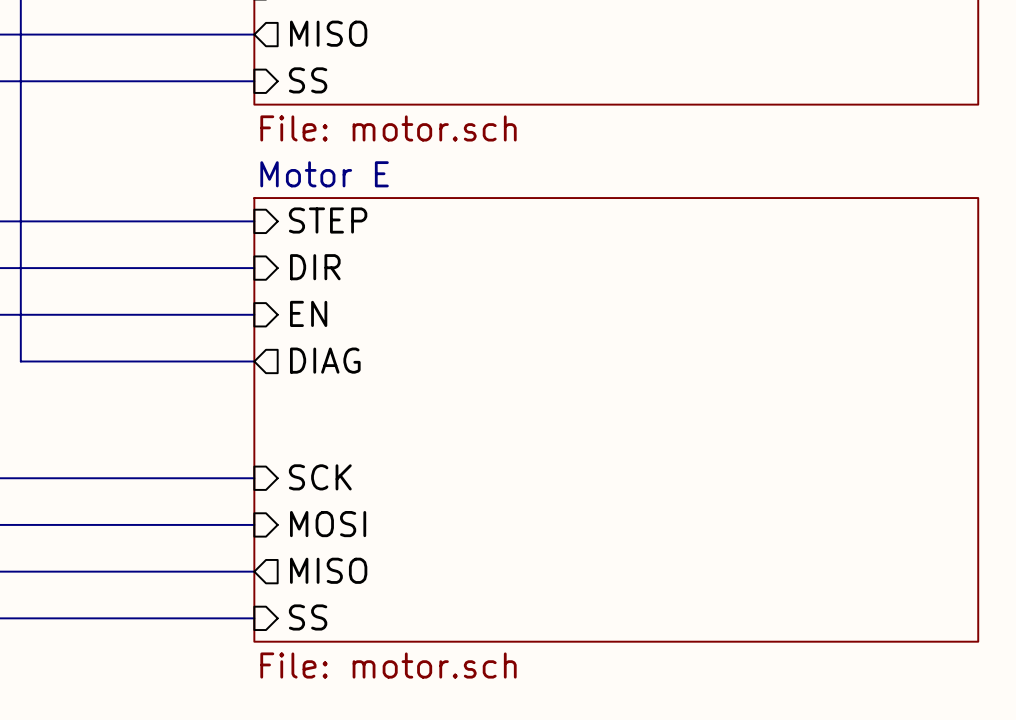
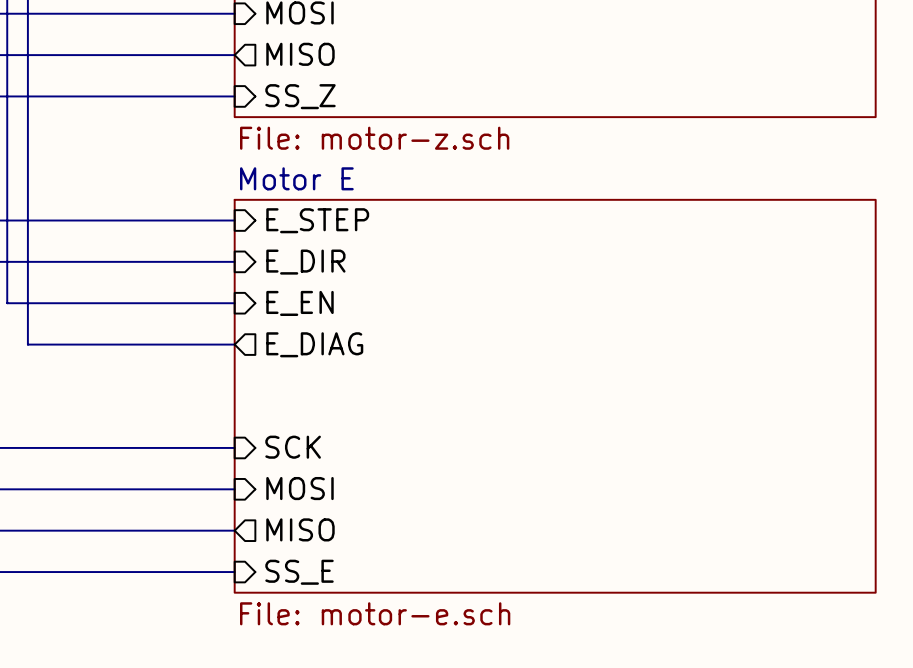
sheet pin: SS (308, 80) -> SS_Z (300, 96)
sheet value: File: motor.sch (388, 128) -> File: motor-z.sch (374, 138)
sheet pin: STEP (328, 220) -> E_STEP (317, 220)
sheet pin: DIR (315, 267) -> E_DIR (305, 262)
sheet pin: EN (308, 313) -> E_EN (299, 303)
sheet pin: DIAG (325, 360) -> E_DIAG (314, 344)
sheet pin: SS (308, 617) -> SS_E (299, 572)
sheet Motor E value: File: motor.sch (388, 665) -> File: motor-e.sch (375, 613)

